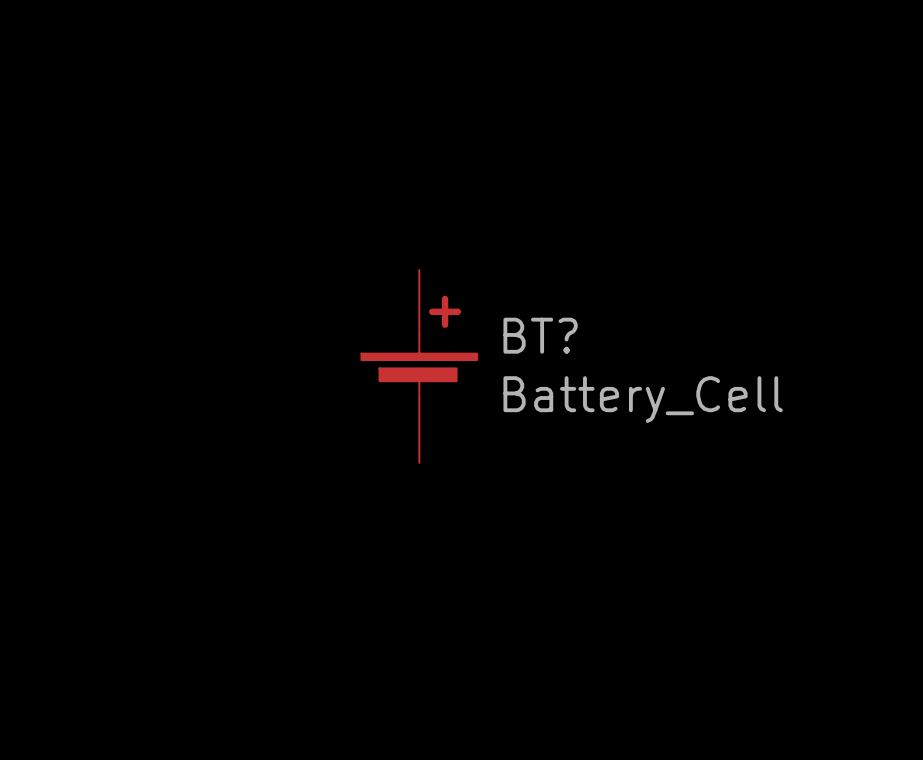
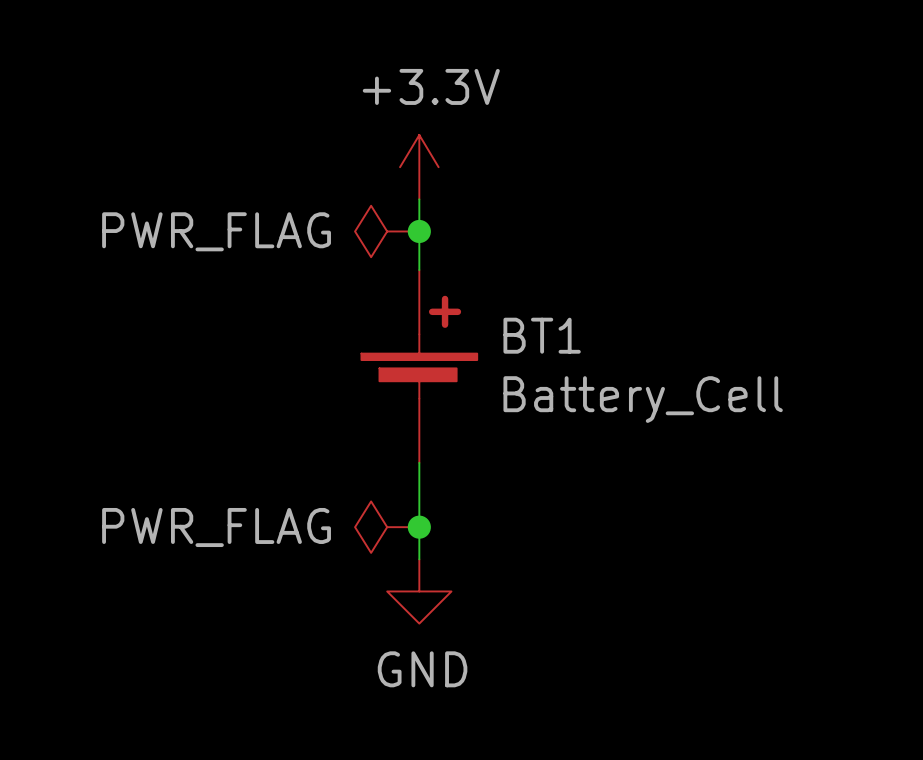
power symbol: none -> +3.3V (419, 167)
wire: none -> (419, 199) (419, 270)
power symbol: none -> PWR_FLAG (387, 231)
junction: none -> (419, 231)
BT? name: BT? (540, 335) -> BT1 (542, 335)
wire: none -> (419, 462) (419, 559)
power symbol: none -> PWR_FLAG (387, 527)
junction: none -> (419, 527)
power symbol: none -> GND (419, 591)

